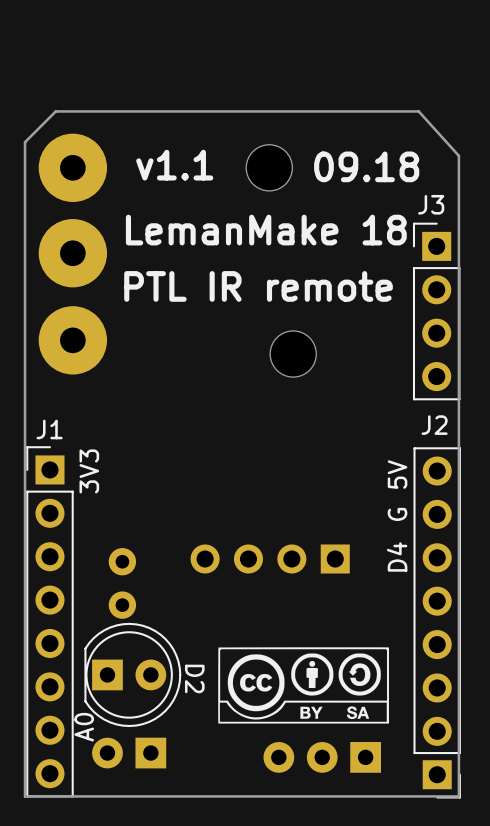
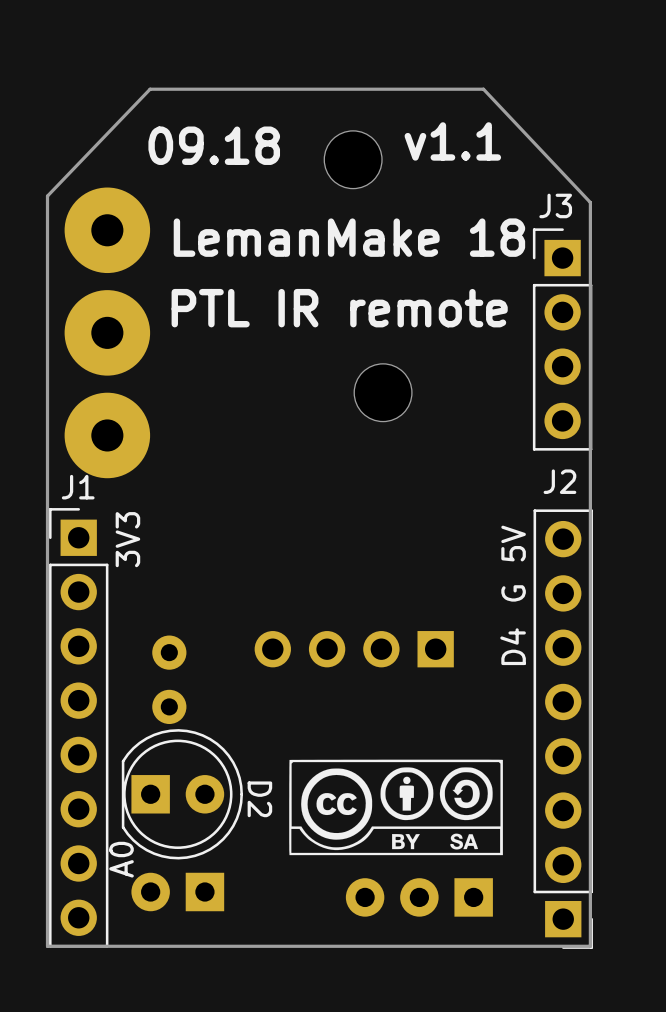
board edge: (107, 111) (55, 111) (25, 142) (25, 196) -> (150, 89) (47, 196)
board edge: (373, 111) (418, 111) (458, 155) (458, 201) -> (483, 89) (590, 202)
text position: v1.1 (174, 165) -> v1.1 (452, 141)
text position: 09.18 (366, 166) -> 09.18 (214, 145)
part: (72, 167) -> none
part: none -> (107, 230)
part: (72, 253) -> none
part: none -> (107, 332)
part: (72, 340) -> none
part: none -> (107, 435)

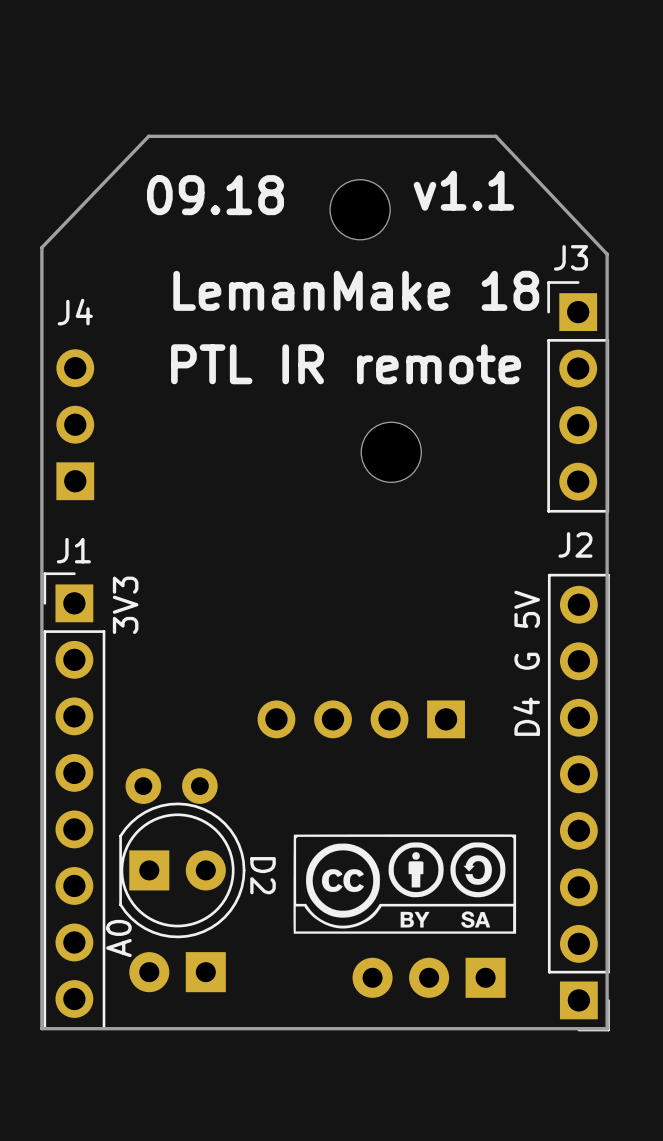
part: (107, 230) -> none
part: (107, 332) -> none
J4: none -> (75, 424)
part: (107, 435) -> none
part rotation: 0° (169, 679) -> 90° clockwise (171, 786)

